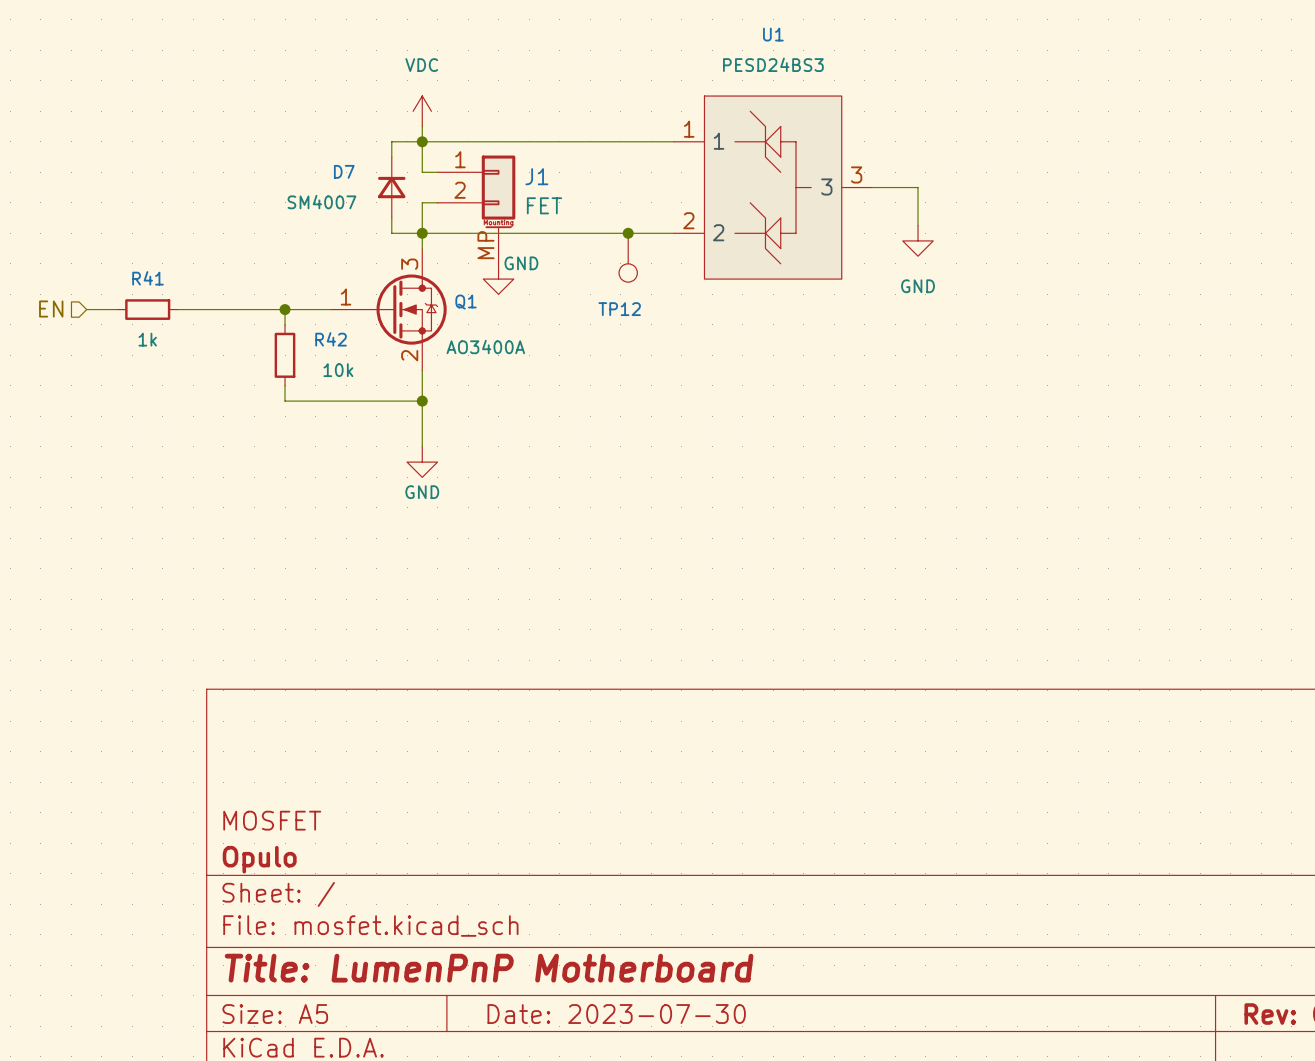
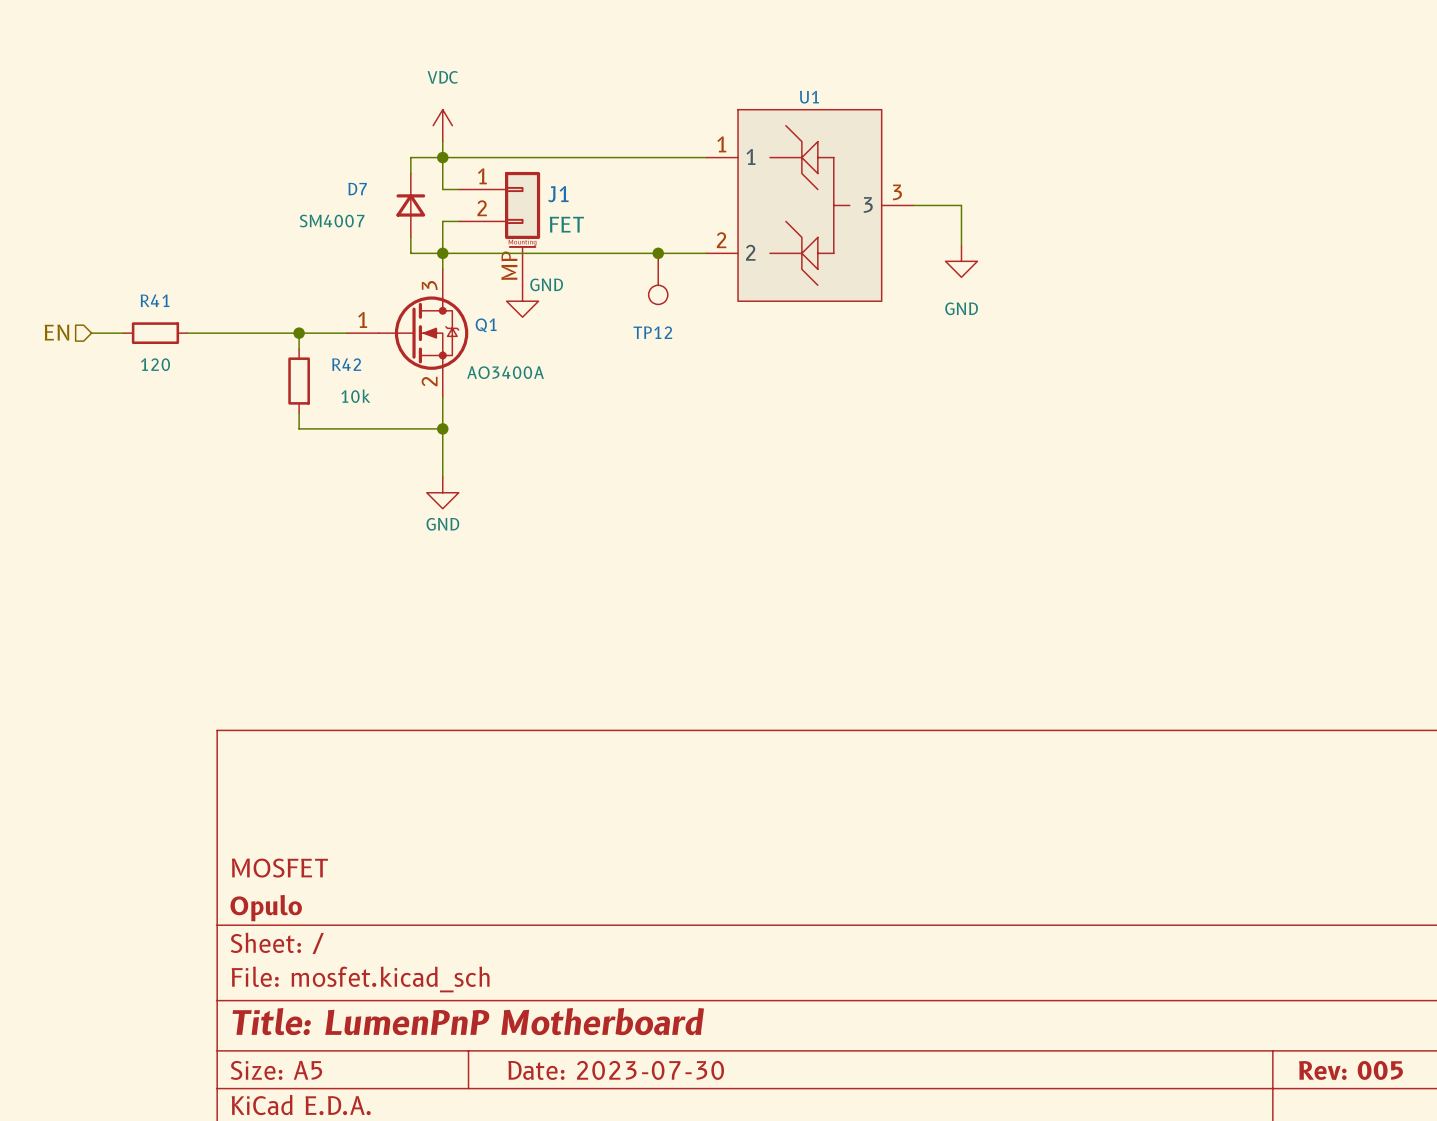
U1 name position: U1 (773, 34) -> U1 (809, 97)
U1 value: PESD24BS3 (773, 64) -> none
R41 value: 1k (147, 339) -> 120 (155, 364)

